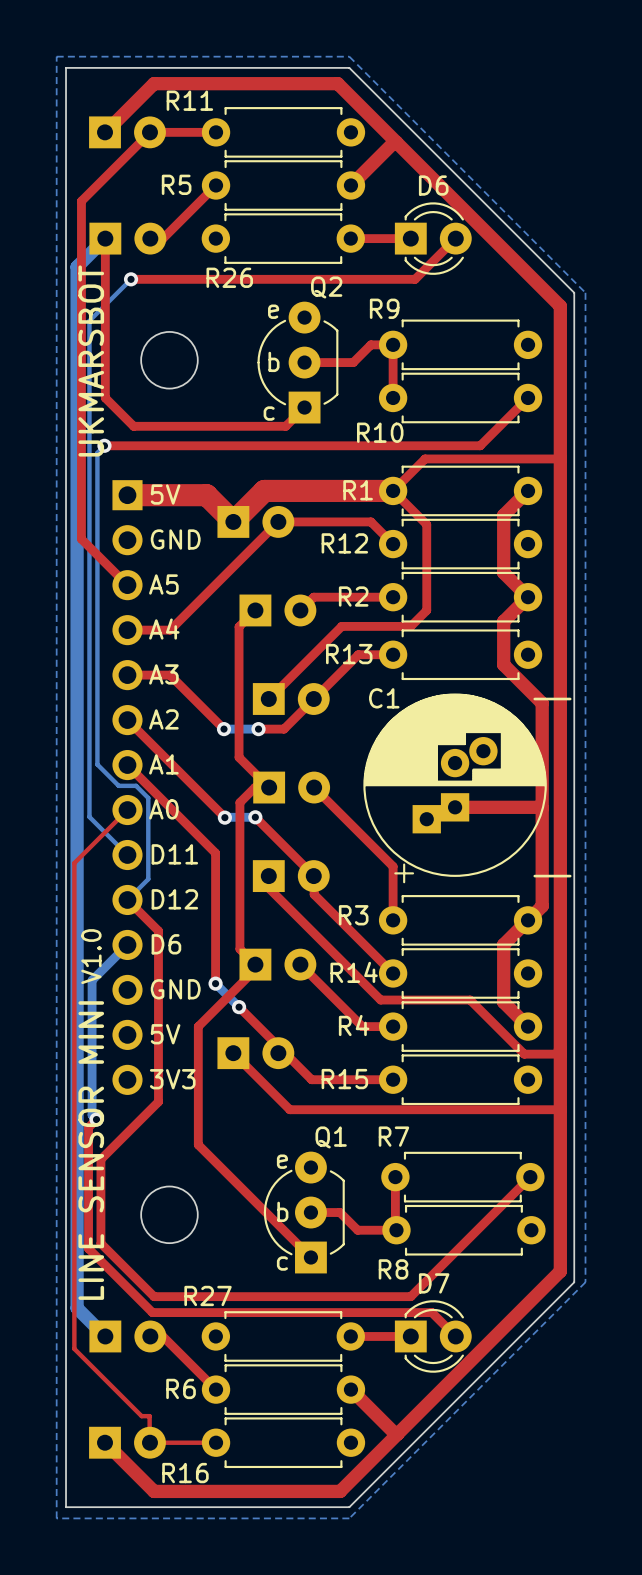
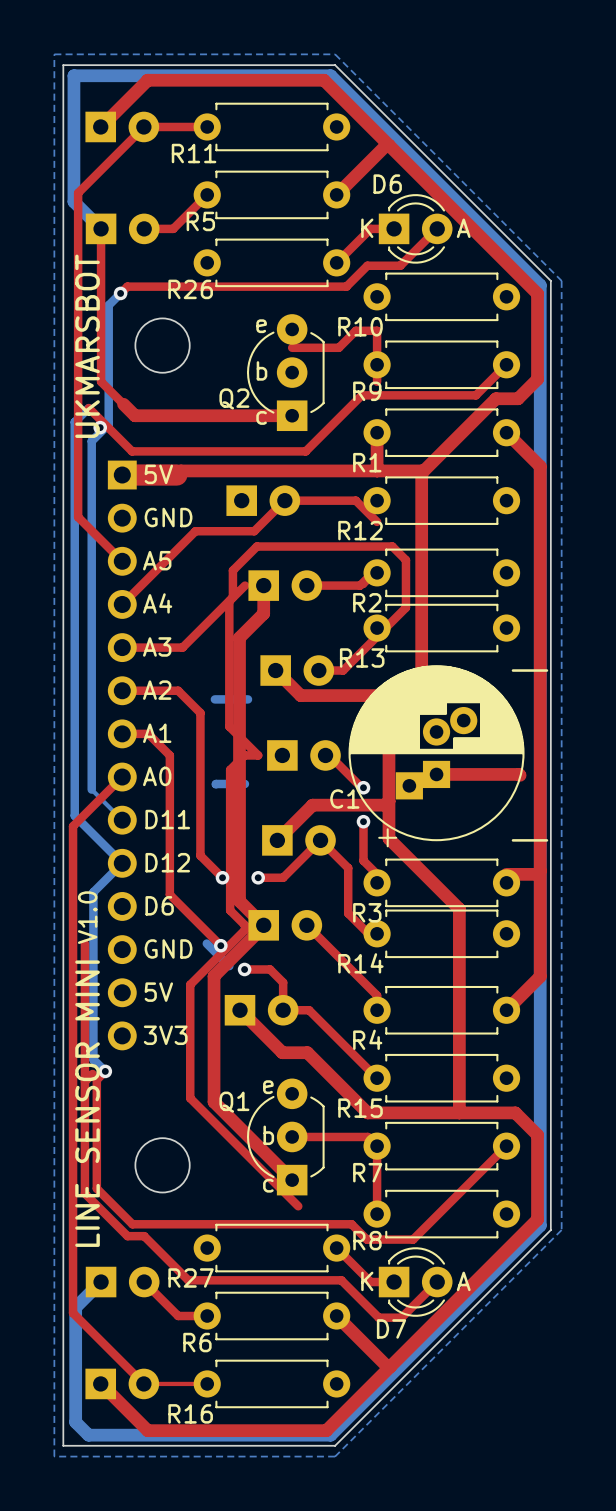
R11 name position: R11 (189, 100) -> R11 (194, 153)
top track: (396, 142) (394, 142) (350, 185) -> none
top track: none -> (389, 145) (386, 145) (336, 194)
R5 name position: R5 (176, 184) -> R5 (200, 221)
top track: (216, 185) (162, 238) -> (207, 194) (173, 228) (156, 228)
R5 position: (283, 185) -> (271, 194)
D6 name position: D6 (433, 185) -> D6 (387, 184)
text: none -> K (367, 228)
text: none -> A (463, 228)
bottom track: (105, 238) (77, 266) (77, 1308) (105, 1336) -> (101, 228) (73, 201) (73, 75) (330, 75) (540, 285) (540, 1225) (330, 1435) (88, 1435) (75, 1422) (75, 1307) (101, 1282)
R26 position: (283, 238) -> (271, 262)
top track: (350, 238) (386, 238) -> (336, 262) (370, 228)
R26 name position: R26 (229, 277) -> R26 (190, 289)
top track: (417, 277) (415, 279) (131, 279) -> (400, 265) (367, 265) (346, 286) (127, 286) (120, 293)
bottom track: (131, 279) (89, 320) (89, 816) (95, 823) -> (120, 293) (108, 305) (108, 424) (91, 441) (91, 789)
via position: (131, 279) -> (120, 293)
Q2 name position: Q2 (326, 287) -> Q2 (234, 398)
R9 name position: R9 (384, 308) -> R9 (367, 391)
text position: e (273, 311) -> e (261, 326)
R10 position: (460, 344) -> (441, 296)
text position: b (274, 361) -> b (261, 370)
Q2 position: (297, 362) -> (285, 372)
top track: none -> (506, 364) (475, 395) (361, 395) (305, 451) (132, 451) (88, 408)
top track: (560, 395) (560, 1183) -> (240, 1010) (282, 1052) (307, 1052) (367, 1112) (515, 1112) (537, 1135)
top track: none -> (537, 379) (518, 398) (495, 398) (423, 470) (377, 470) (377, 432)
R9 position: (460, 397) -> (441, 364)
top track: (528, 397) (480, 445) (104, 445) -> none
top track: (304, 407) (285, 426) (133, 426) -> none
text position: c (269, 413) -> c (261, 417)
top track: none -> (123, 404) (135, 415) (292, 415)
bottom track: none -> (88, 408) (74, 422) (74, 815) (122, 863) (93, 892) (93, 1059) (105, 1071)
R10 name position: R10 (380, 432) -> R10 (360, 326)
bottom track: (104, 445) (97, 452) (97, 764) (118, 785) (136, 785) (148, 798) (148, 879) (127, 899) -> none
top track: none -> (506, 432) (540, 466) (540, 976) (506, 1010)
top track: (560, 458) (425, 458) (393, 490) (426, 524) (426, 610) (410, 626) (341, 626) (269, 699) -> none
top track: (264, 490) (233, 521) (206, 495) (184, 495) -> (253, 470) (180, 470) (176, 475)
top track width: thick (264, 490) (393, 490) -> thin (253, 470) (377, 470)
R1 name position: R1 (358, 490) -> R1 (367, 462)
top track: none -> (422, 470) (421, 697)
R1 position: (460, 490) -> (441, 432)
top track: (528, 490) (503, 515) (503, 572) (528, 597) (503, 621) (503, 664) (542, 703) (542, 906) (503, 944) (503, 1002) (528, 1026) -> none
part position: (255, 521) -> (263, 500)
top track: (296, 521) (278, 521) (170, 630) (127, 630) -> (284, 500) (254, 531) (195, 531) (122, 604)
R12 name position: R12 (344, 543) -> R12 (360, 530)
R12 position: (460, 544) -> (441, 500)
R2 name position: R2 (353, 596) -> R2 (367, 602)
top track: (393, 597) (313, 597) (300, 610) -> (377, 572) (364, 585) (306, 585) (360, 585) (377, 568)
top track: none -> (263, 585) (263, 613) (239, 637) (239, 901) (263, 925)
part position: (277, 610) -> (285, 585)
R13 name position: R13 (349, 654) -> R13 (362, 658)
top track: (393, 654) (358, 654) (284, 729) (258, 729) -> none
top track: (170, 675) (224, 729) -> (163, 647) (182, 647) (232, 597) (232, 570) (256, 546) (392, 546) (405, 560) (405, 607) (343, 670) (318, 670)
C1 name position: C1 (384, 698) -> C1 (344, 798)
top track: none -> (275, 670) (300, 695) (419, 695) (421, 697)
part position: (291, 699) -> (297, 670)
top track: (127, 720) (224, 817) -> (122, 690) (178, 690) (200, 712) (200, 855) (222, 877)
top track: none -> (421, 697) (388, 729) (388, 838) (459, 909) (459, 1112)
via: (224, 729) -> none
via: (258, 729) -> none
top track: (127, 765) (215, 853) (215, 983) -> (122, 733) (148, 733) (169, 755) (169, 894) (220, 945)
part position: (291, 787) -> (303, 755)
top track: (314, 787) (393, 866) (393, 920) -> none
top track: none -> (329, 755) (363, 787)
via: (224, 817) -> none
top track: (255, 817) (314, 876) (314, 894) (393, 973) -> none
via: (255, 817) -> none
via: none -> (363, 787)
top track: none -> (388, 801) (385, 805) (312, 805) (277, 840)
top track: none -> (363, 821) (363, 860) (377, 874)
via: none -> (363, 821)
top track: (74, 863) (74, 1348) (141, 1416) (149, 1416) (149, 1442) -> (122, 777) (73, 826) (73, 1313) (143, 1383)
top track: (269, 876) (269, 888) (380, 1000) (470, 1000) (524, 1054) (560, 1054) -> none
part position: (291, 876) -> (298, 840)
top track: (127, 899) (158, 930) (158, 1101) (100, 1159) -> (105, 1071) (96, 1079) (96, 1112)
top track: none -> (540, 870) (536, 874) (506, 874)
via: none -> (222, 877)
top track: none -> (258, 877) (283, 877) (320, 840) (348, 868) (348, 913) (377, 942)
via: none -> (258, 877)
R3 name position: R3 (353, 915) -> R3 (367, 912)
bottom track: (127, 944) (92, 980) (92, 1115) (96, 1119) -> none
part position: (277, 964) -> (285, 925)
top track: (300, 964) (362, 1026) (393, 1026) -> none
top track: none -> (306, 925) (377, 995) (377, 1010)
top track: none -> (263, 926) (214, 976) (214, 1101) (292, 1180)
R14 name position: R14 (354, 972) -> R14 (360, 963)
via: (215, 983) -> none
via: none -> (220, 945)
top track: (239, 1007) (311, 1079) (393, 1079) -> none
via: (239, 1007) -> none
top track: none -> (244, 969) (270, 969) (283, 982) (283, 1010) (309, 1010) (377, 1078)
via: none -> (244, 969)
R4 name position: R4 (354, 1025) -> R4 (367, 1039)
R4 position: (460, 1026) -> (441, 1010)
top track: (233, 1053) (289, 1109) (560, 1109) -> none
part position: (255, 1053) -> (261, 1010)
R15 name position: R15 (344, 1079) -> R15 (360, 1108)
R15 position: (460, 1079) -> (441, 1078)
via position: (96, 1119) -> (105, 1071)
R7 name position: R7 (393, 1136) -> R7 (367, 1172)
Q1 name position: Q1 (331, 1137) -> Q1 (234, 1102)
text position: e (282, 1161) -> e (268, 1087)
top track: (395, 1177) (396, 1230) (357, 1230) (339, 1212) (310, 1212) -> none
R7 position: (462, 1177) -> (441, 1146)
top track: (530, 1177) (410, 1296) (154, 1296) (100, 1243) (100, 1239) -> (506, 1146) (413, 1239) (366, 1239) (351, 1224) (132, 1224) (96, 1188)
top track: none -> (292, 1136) (367, 1136) (377, 1146) (377, 1214)
text position: b (282, 1211) -> b (268, 1135)
Q1 position: (304, 1212) -> (285, 1136)
R8 position: (463, 1230) -> (441, 1214)
top track: (88, 1244) (88, 1248) (152, 1312) (431, 1312) (455, 1336) -> (84, 1193) (127, 1236) (144, 1236) (188, 1280) (341, 1280) (378, 1317) (401, 1317) (437, 1282)
text position: c (282, 1263) -> c (268, 1185)
R8 name position: R8 (393, 1269) -> R8 (367, 1240)
D7 name position: D7 (434, 1283) -> D7 (391, 1328)
R27 name position: R27 (208, 1295) -> R27 (191, 1278)
text: none -> K (367, 1281)
text: none -> A (463, 1281)
top track: (150, 1336) (162, 1336) (216, 1389) -> (144, 1282) (178, 1316) (207, 1316)
R27 position: (283, 1336) -> (271, 1248)
top track: (350, 1336) (386, 1336) -> (336, 1248) (370, 1282)
top track: none -> (336, 1316) (387, 1366) (390, 1366)
R6 name position: R6 (181, 1388) -> R6 (197, 1342)
R6 position: (283, 1389) -> (271, 1316)
top track: (350, 1389) (395, 1434) (397, 1434) -> none
R16 name position: R16 (185, 1473) -> R16 (190, 1413)

